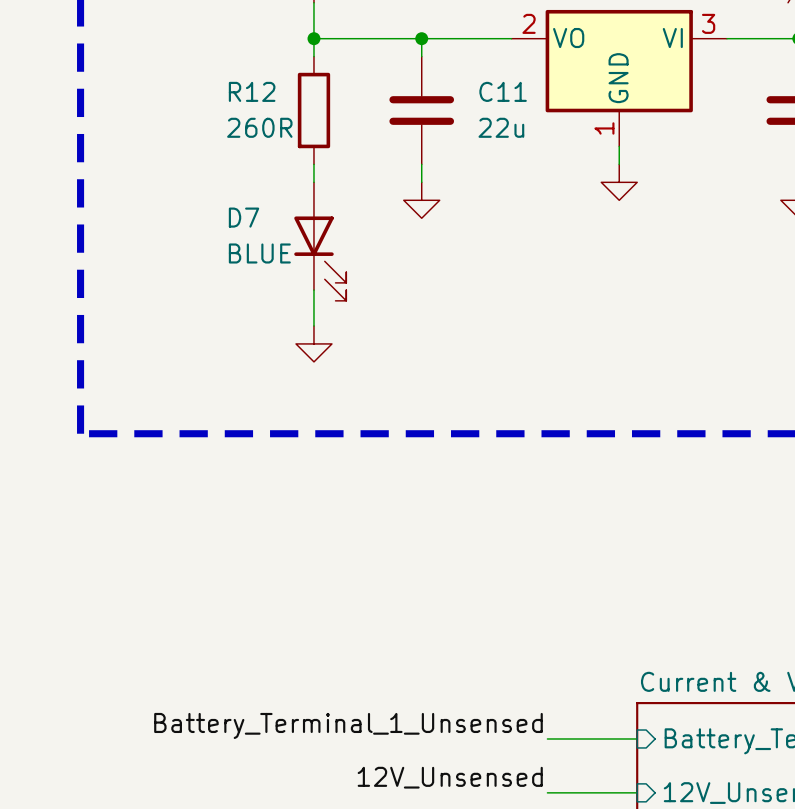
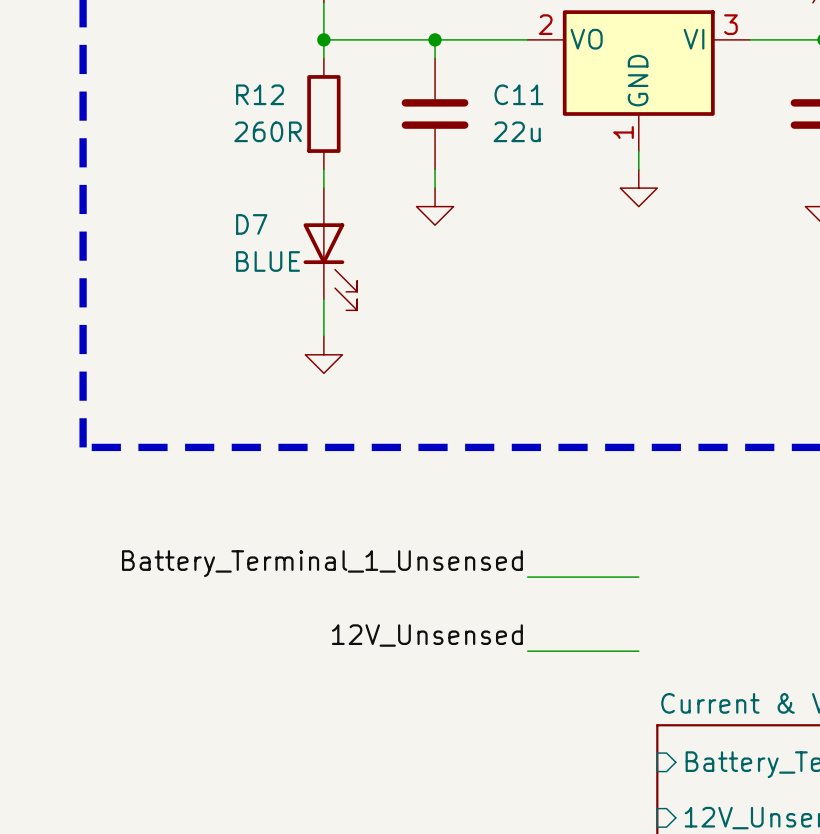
wire: none -> (527, 577) (638, 577)
wire: none -> (527, 651) (638, 651)
label position: Battery_Terminal_1_Unsensed (348, 725) -> Battery_Terminal_1_Unsensed (322, 563)
wire: (547, 738) (637, 738) -> none
label position: 12V_Unsensed (450, 777) -> 12V_Unsensed (427, 635)
wire: (547, 792) (637, 792) -> none

